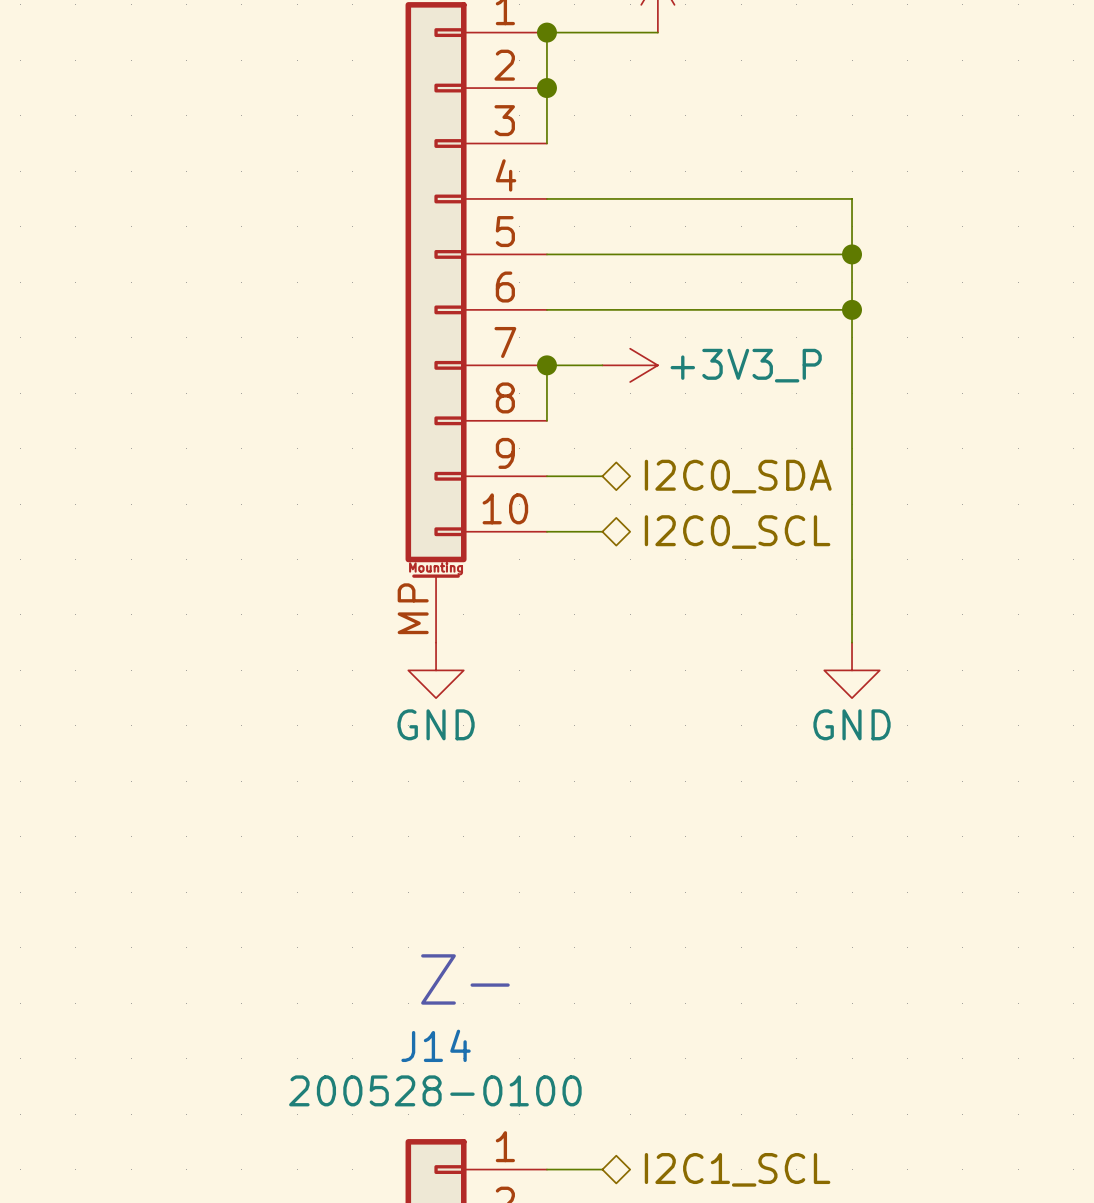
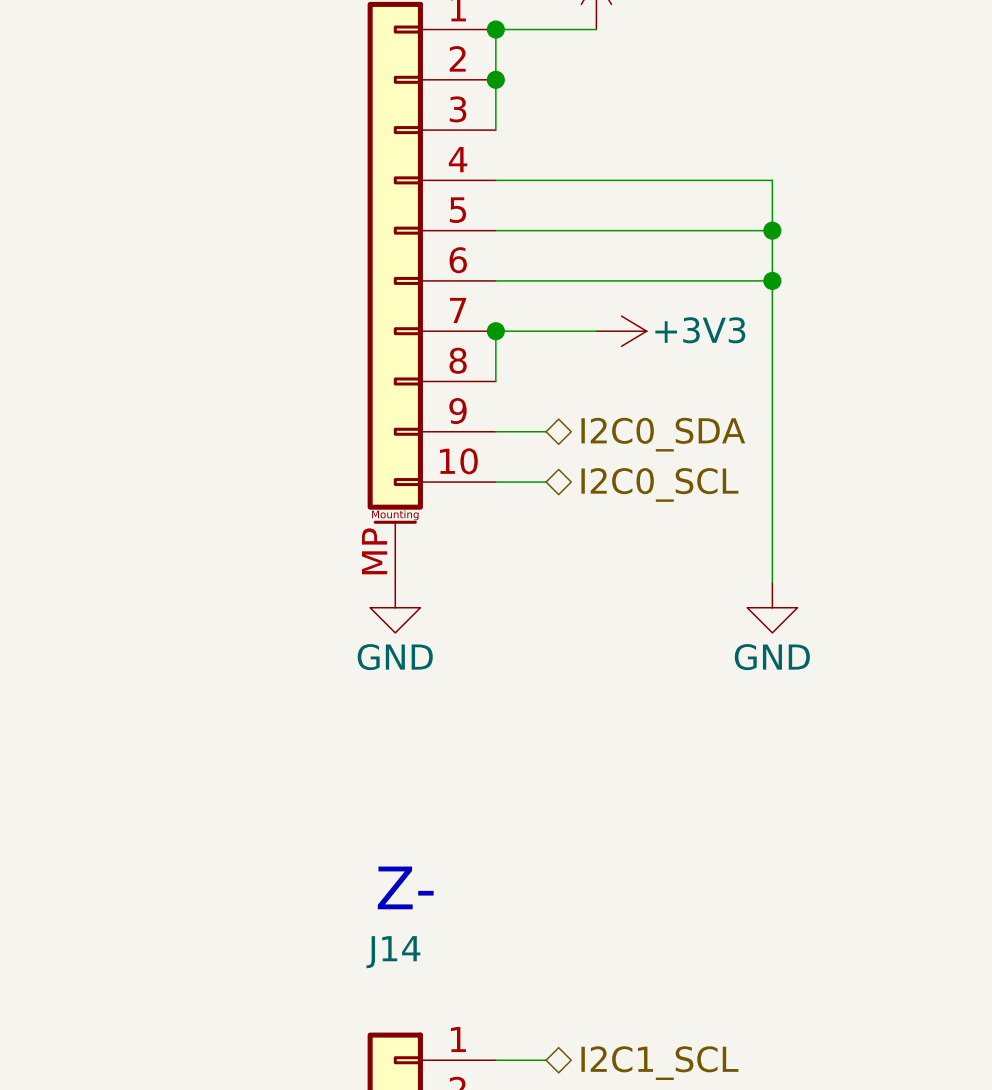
power symbol: +3V3_P (630, 365) -> none
power symbol: none -> +3V3 (621, 331)
J14 value: 200528-0100 (435, 1090) -> none

